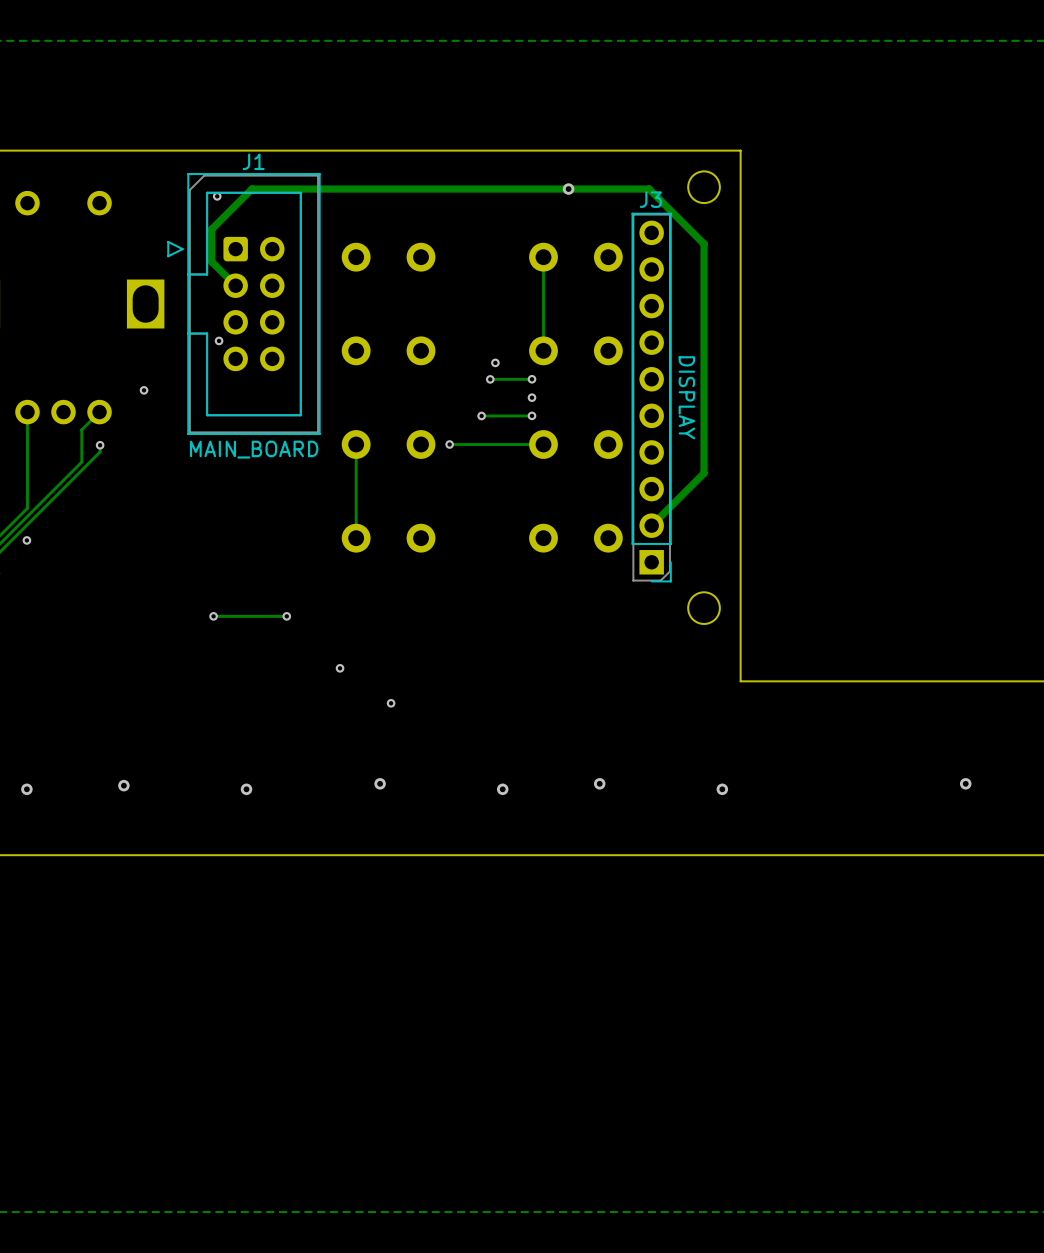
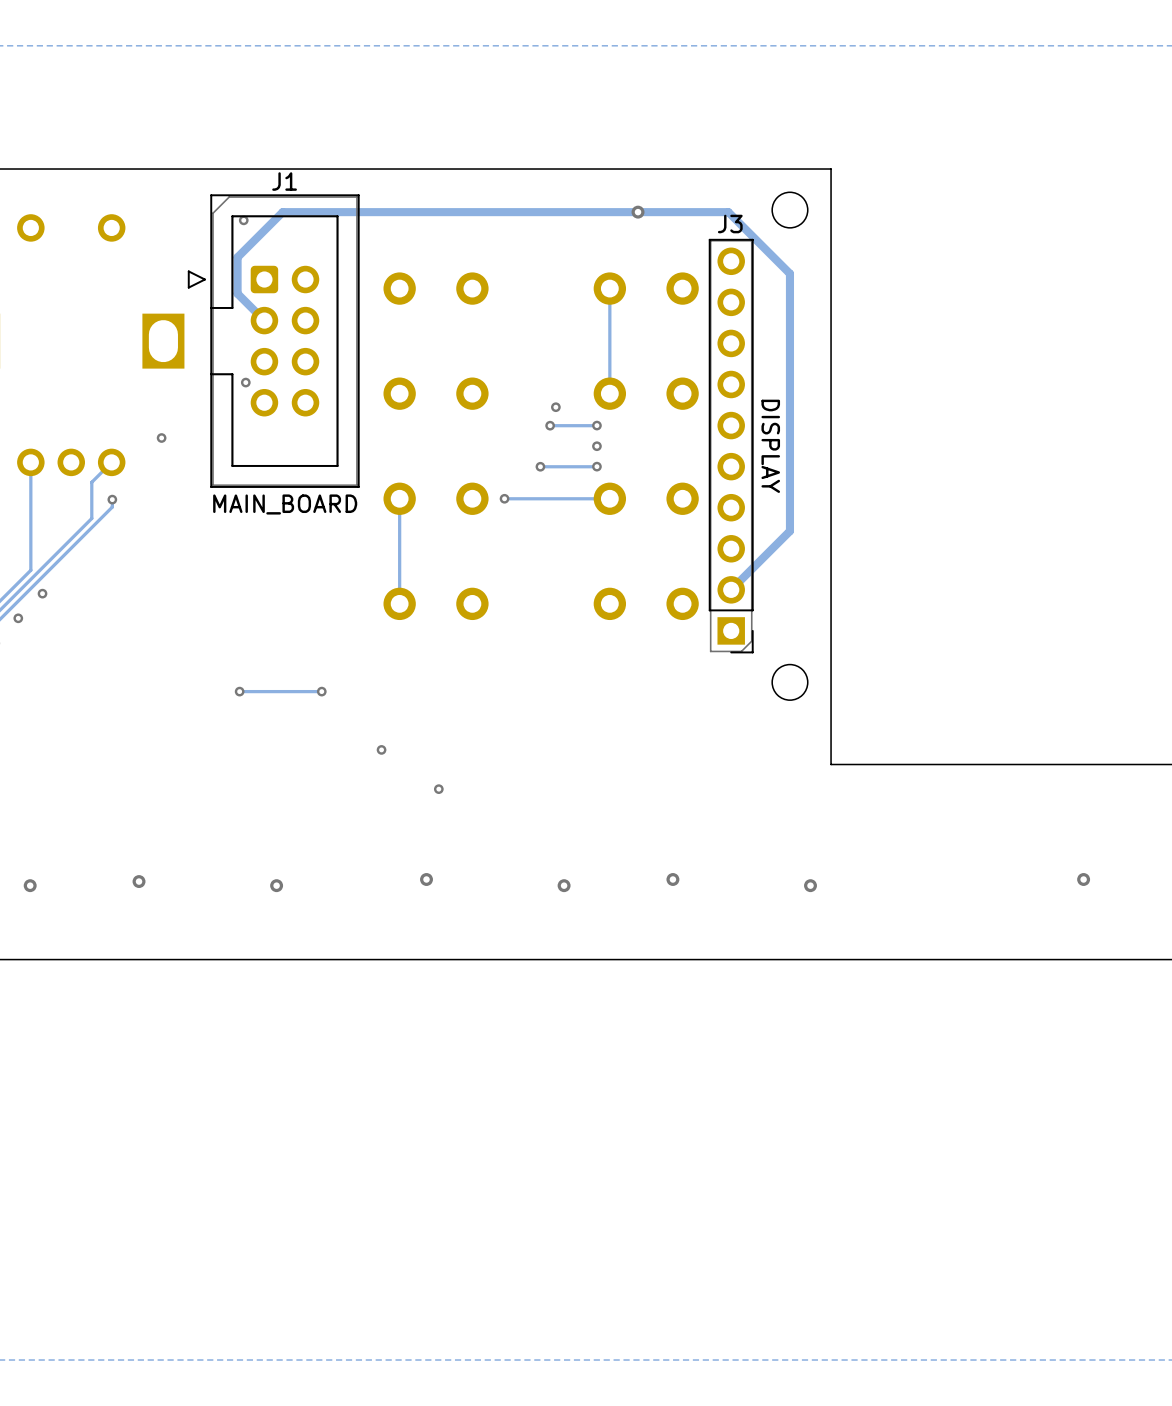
via: none -> (42, 593)
via: (26, 540) -> none
via: none -> (18, 618)

